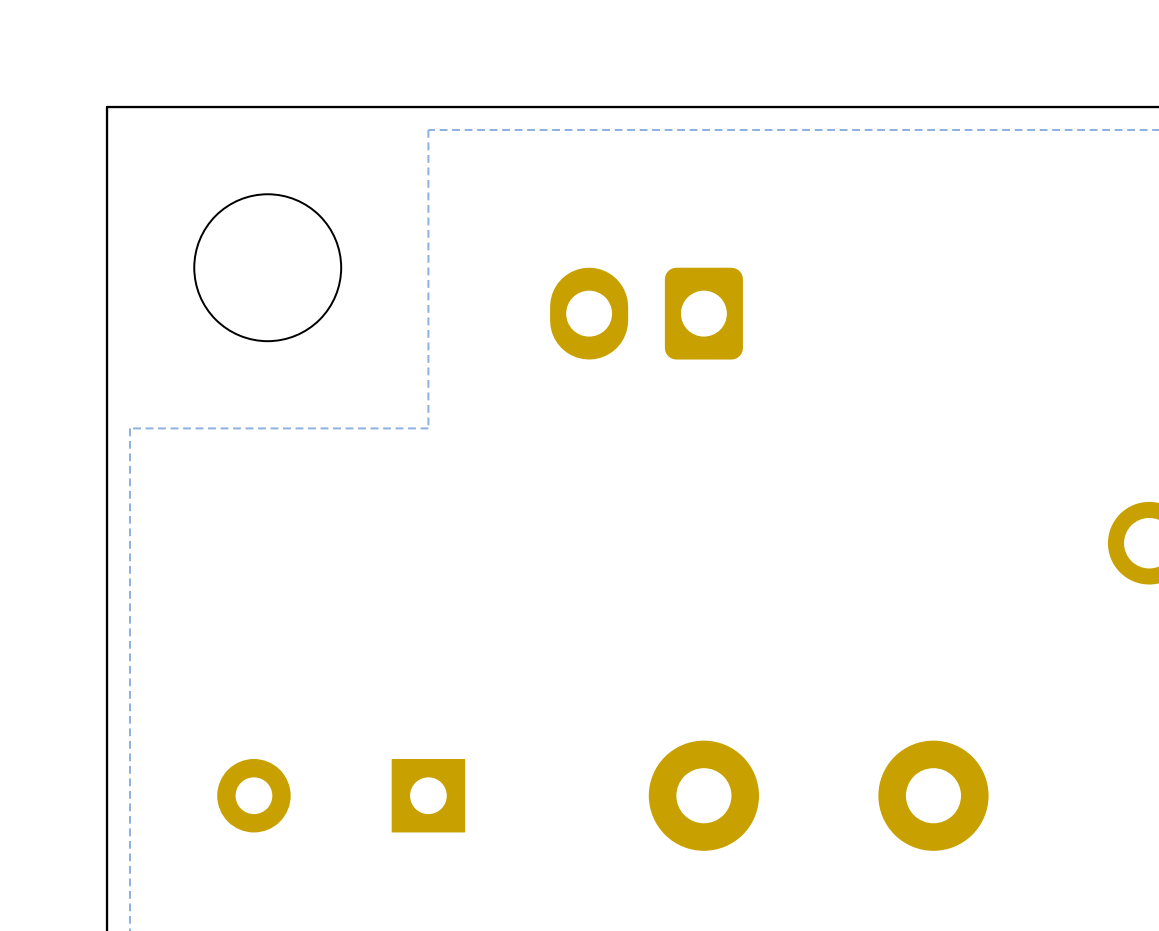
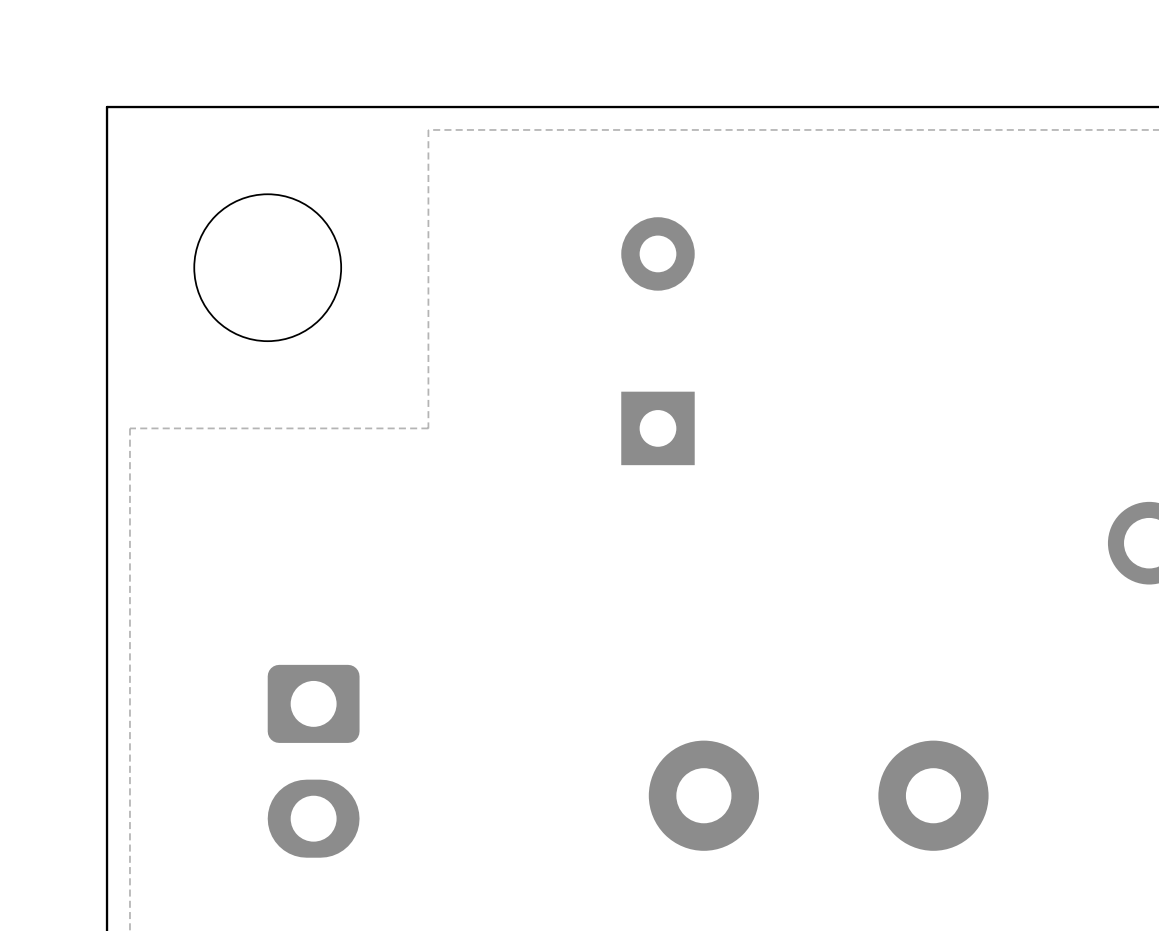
part footprint: [550, 267, 743, 360] -> [621, 217, 695, 466]
part footprint: [217, 758, 466, 833] -> [267, 664, 360, 858]

